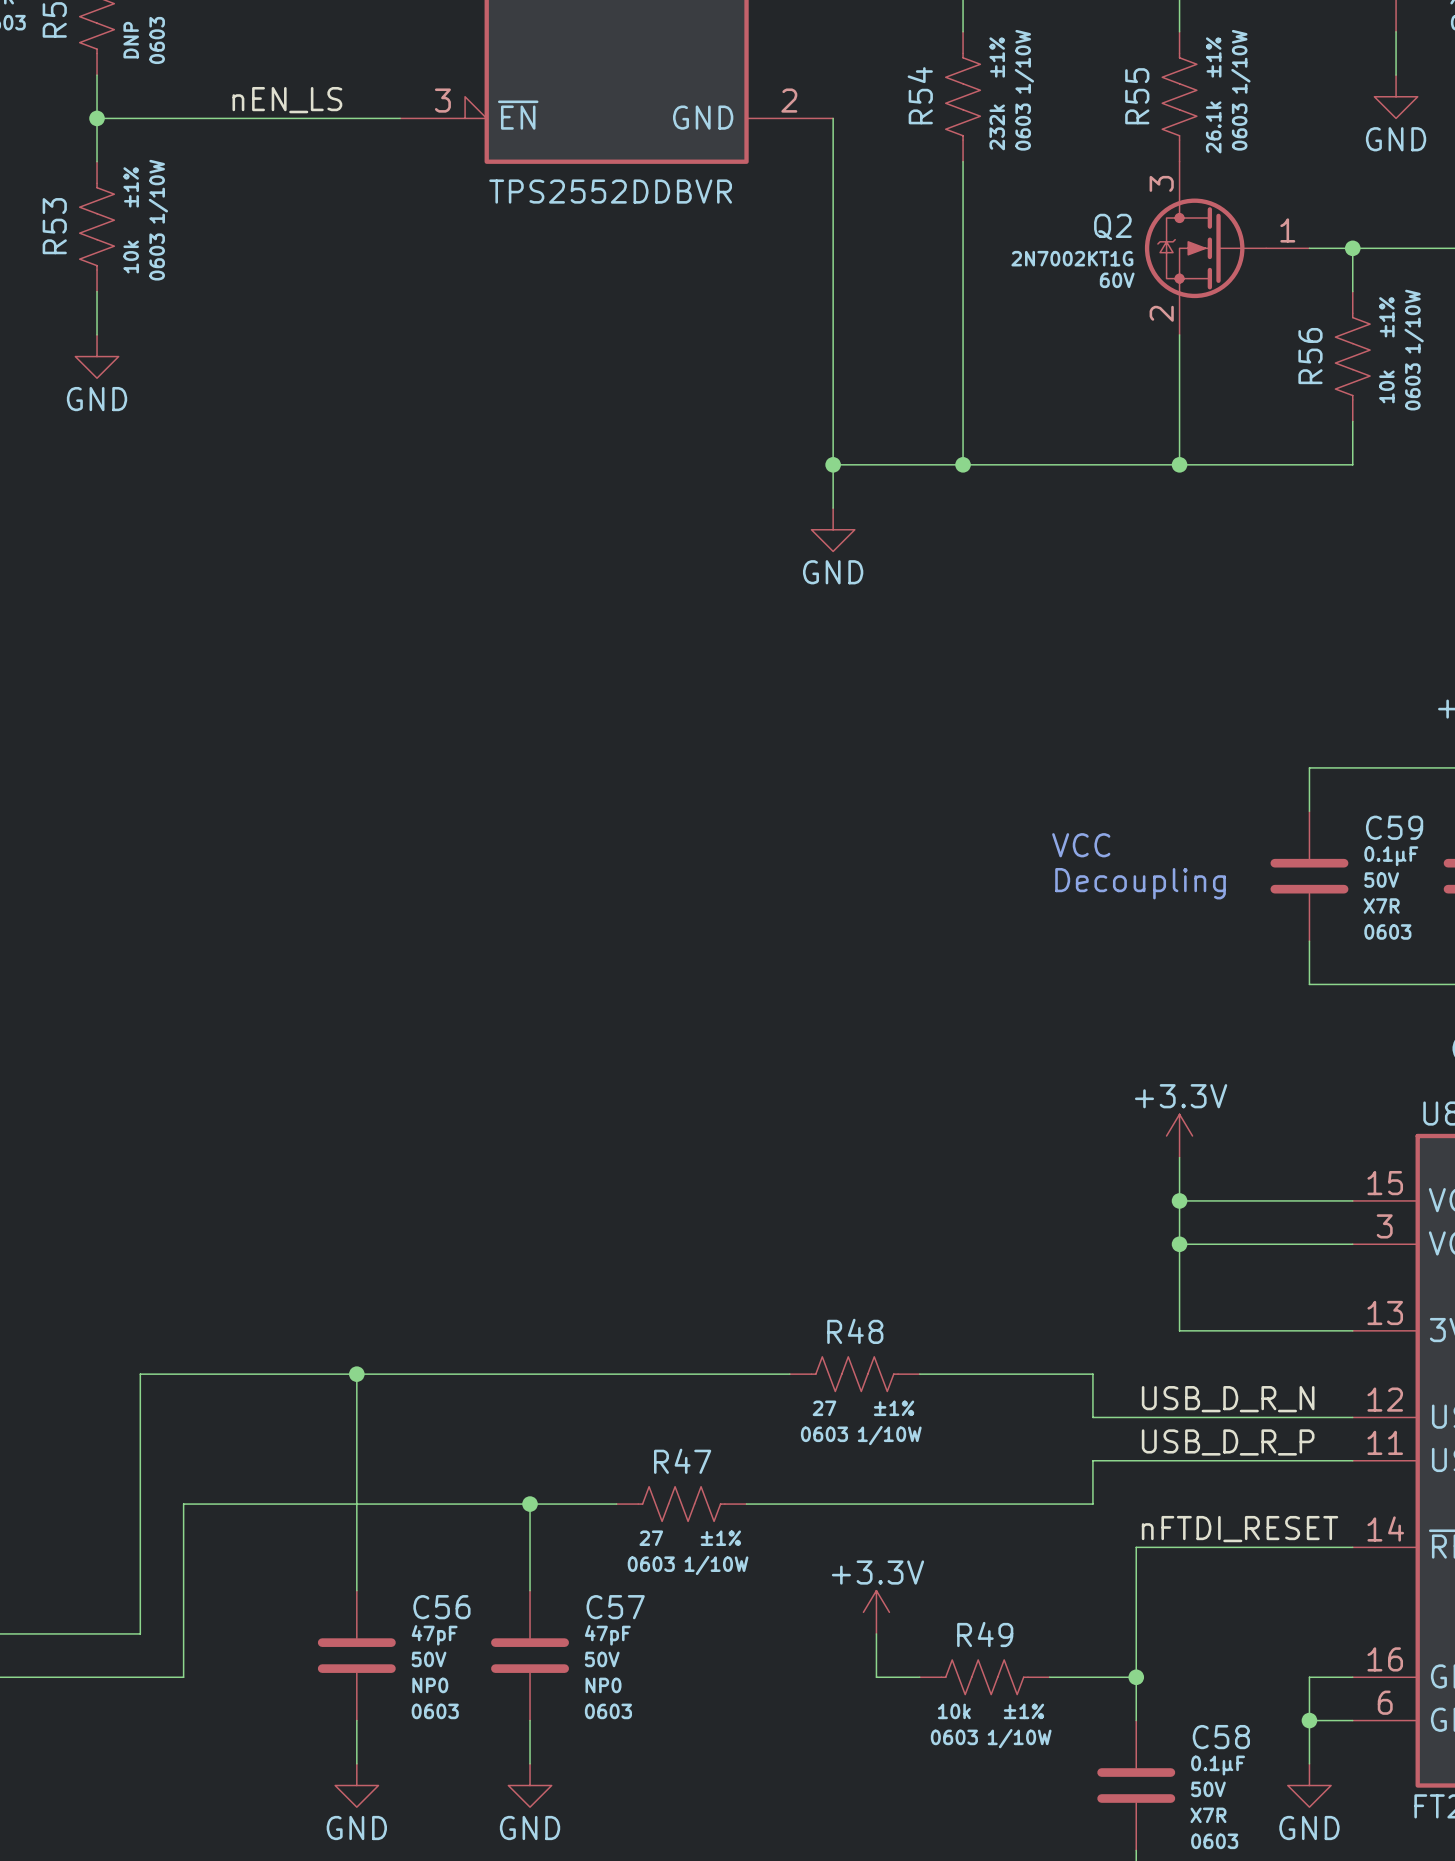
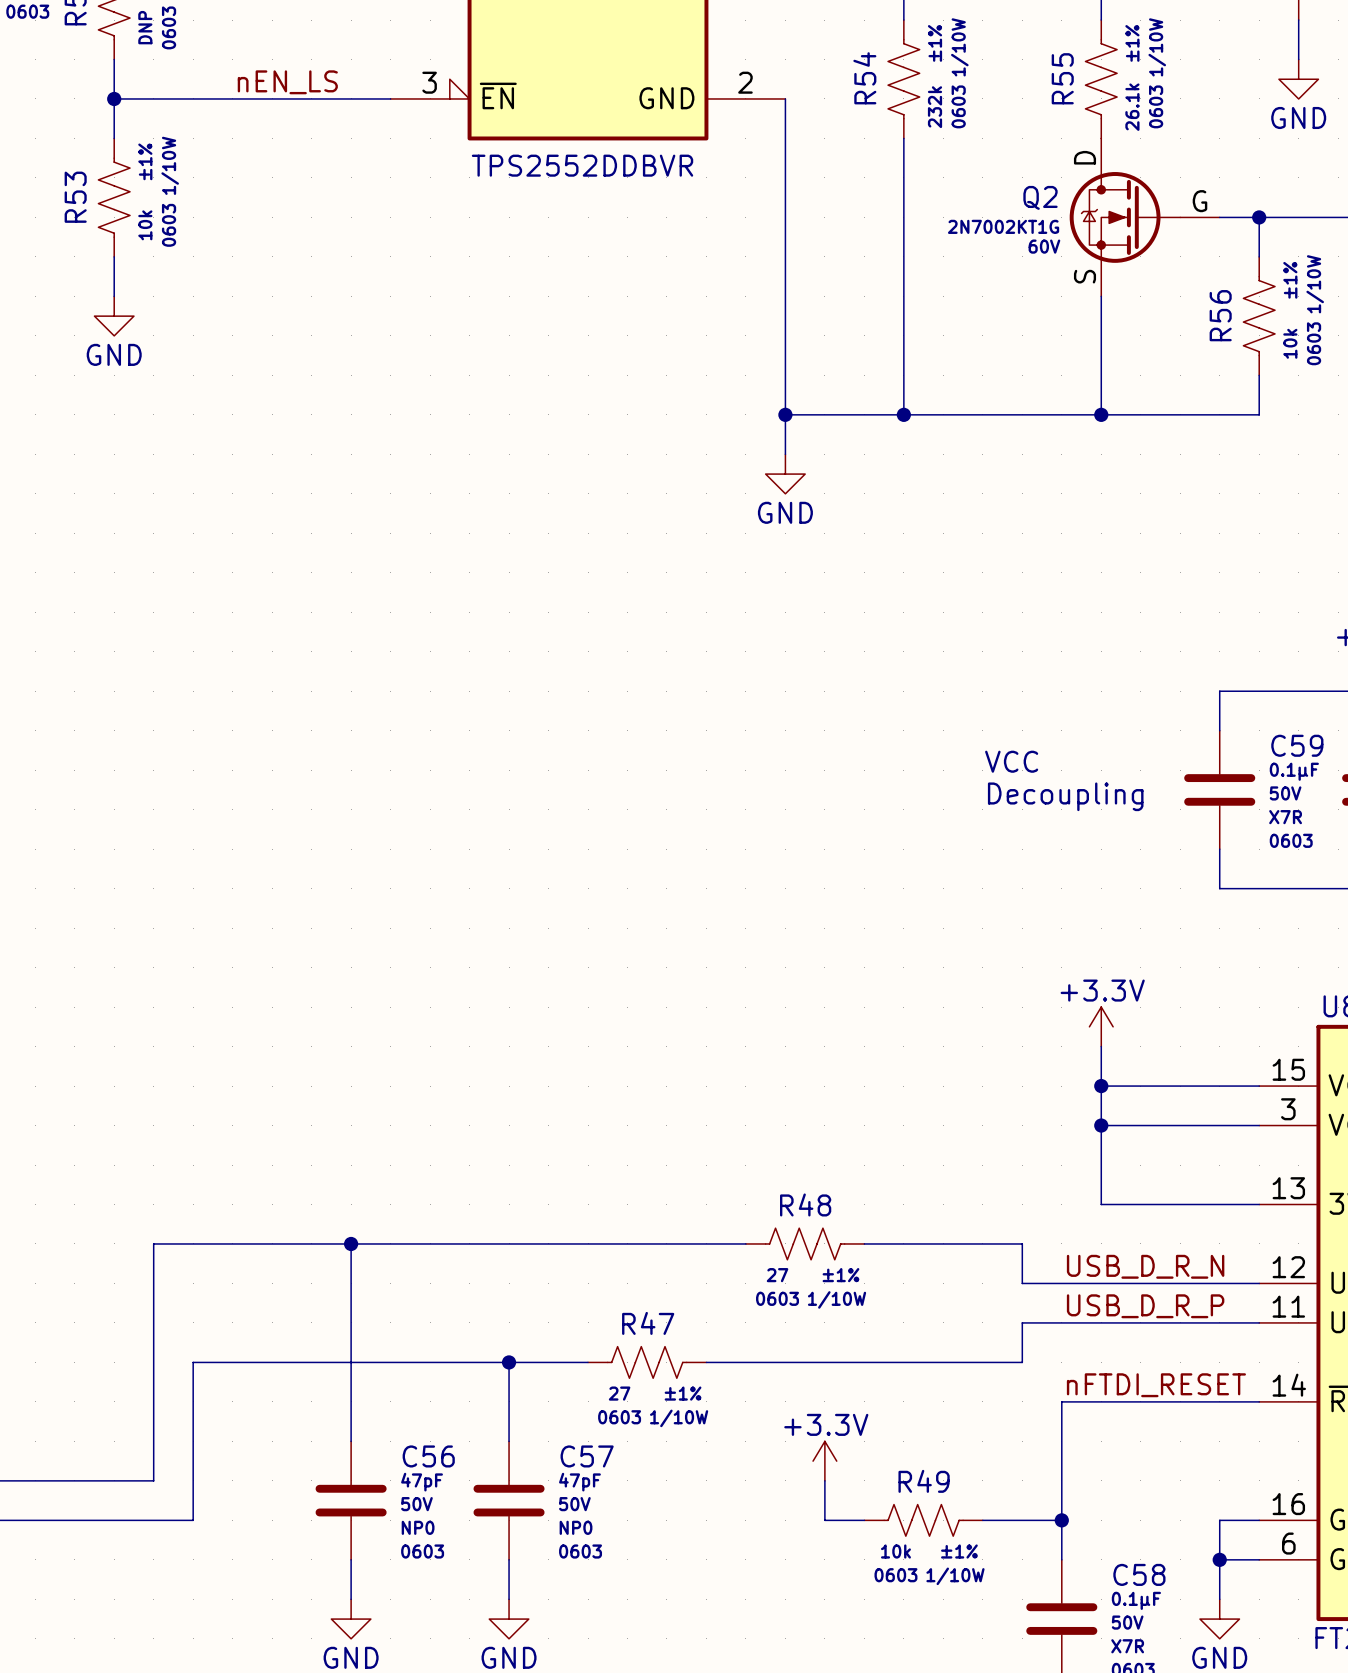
Q2 pin name: none -> D (1084, 157)
Q2 pin number: 3 (1161, 183) -> none
Q2 pin name: none -> G (1199, 201)
Q2 pin number: 1 (1287, 230) -> none
Q2 pin name: none -> S (1084, 276)
Q2 pin number: 2 (1161, 313) -> none

